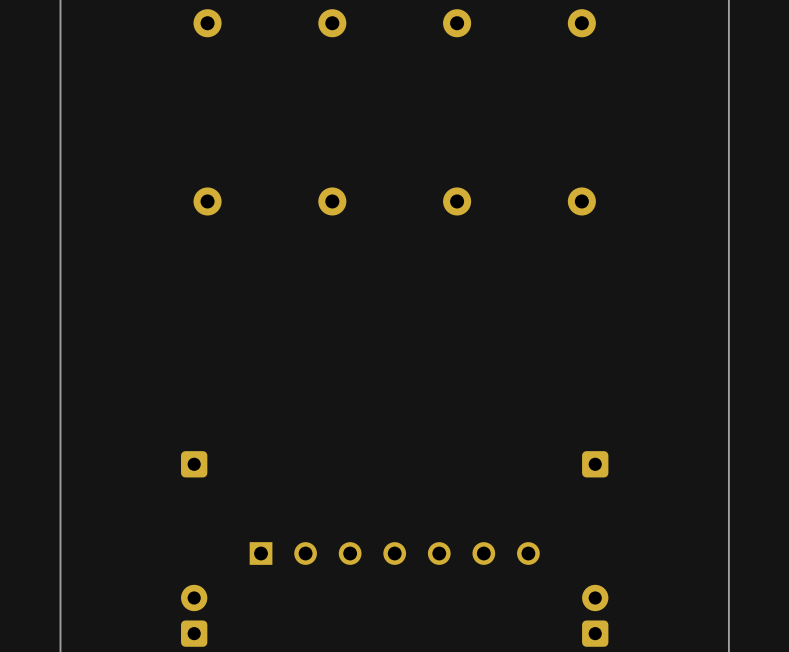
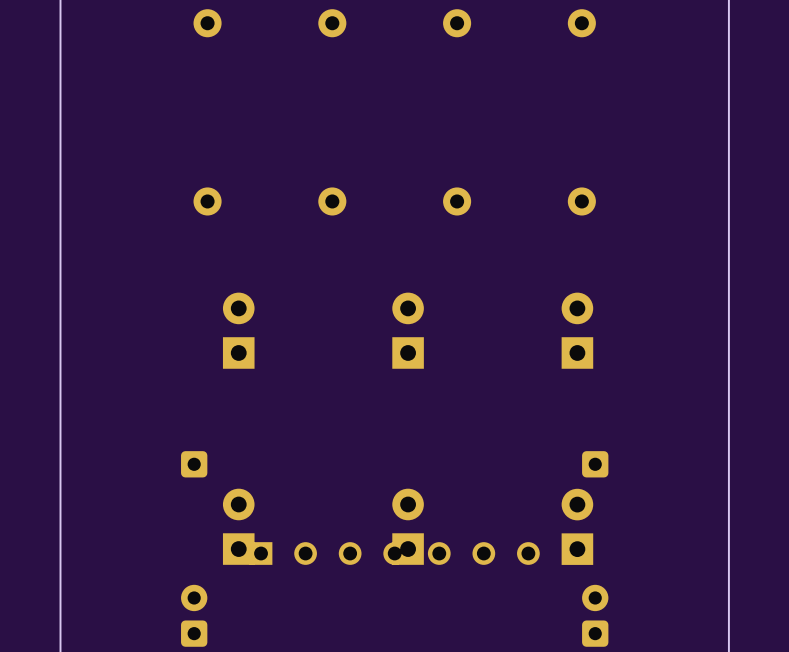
part: none -> (238, 330)
part: none -> (408, 330)
part: none -> (577, 330)
part: none -> (238, 526)
part: none -> (408, 526)
part: none -> (577, 526)

